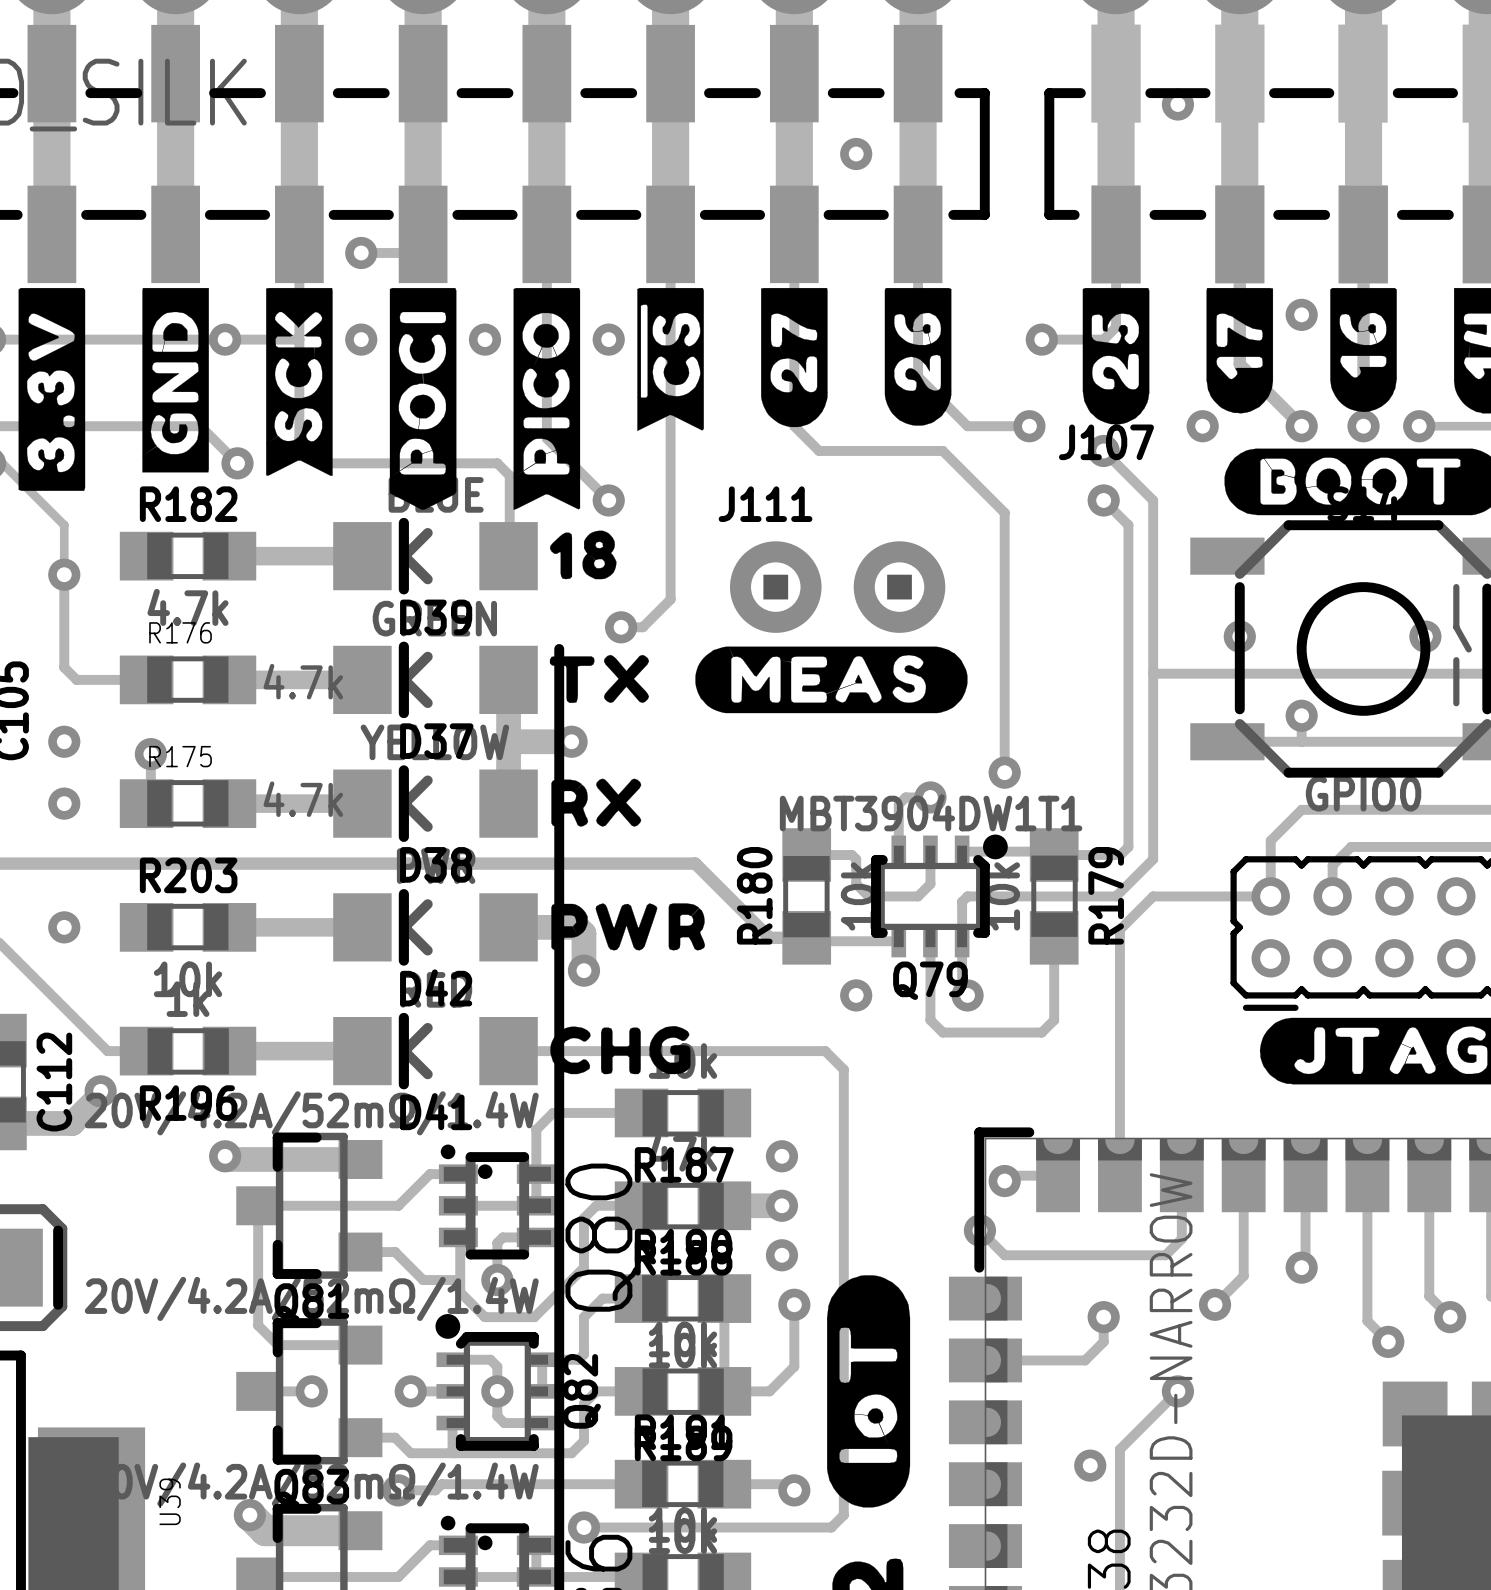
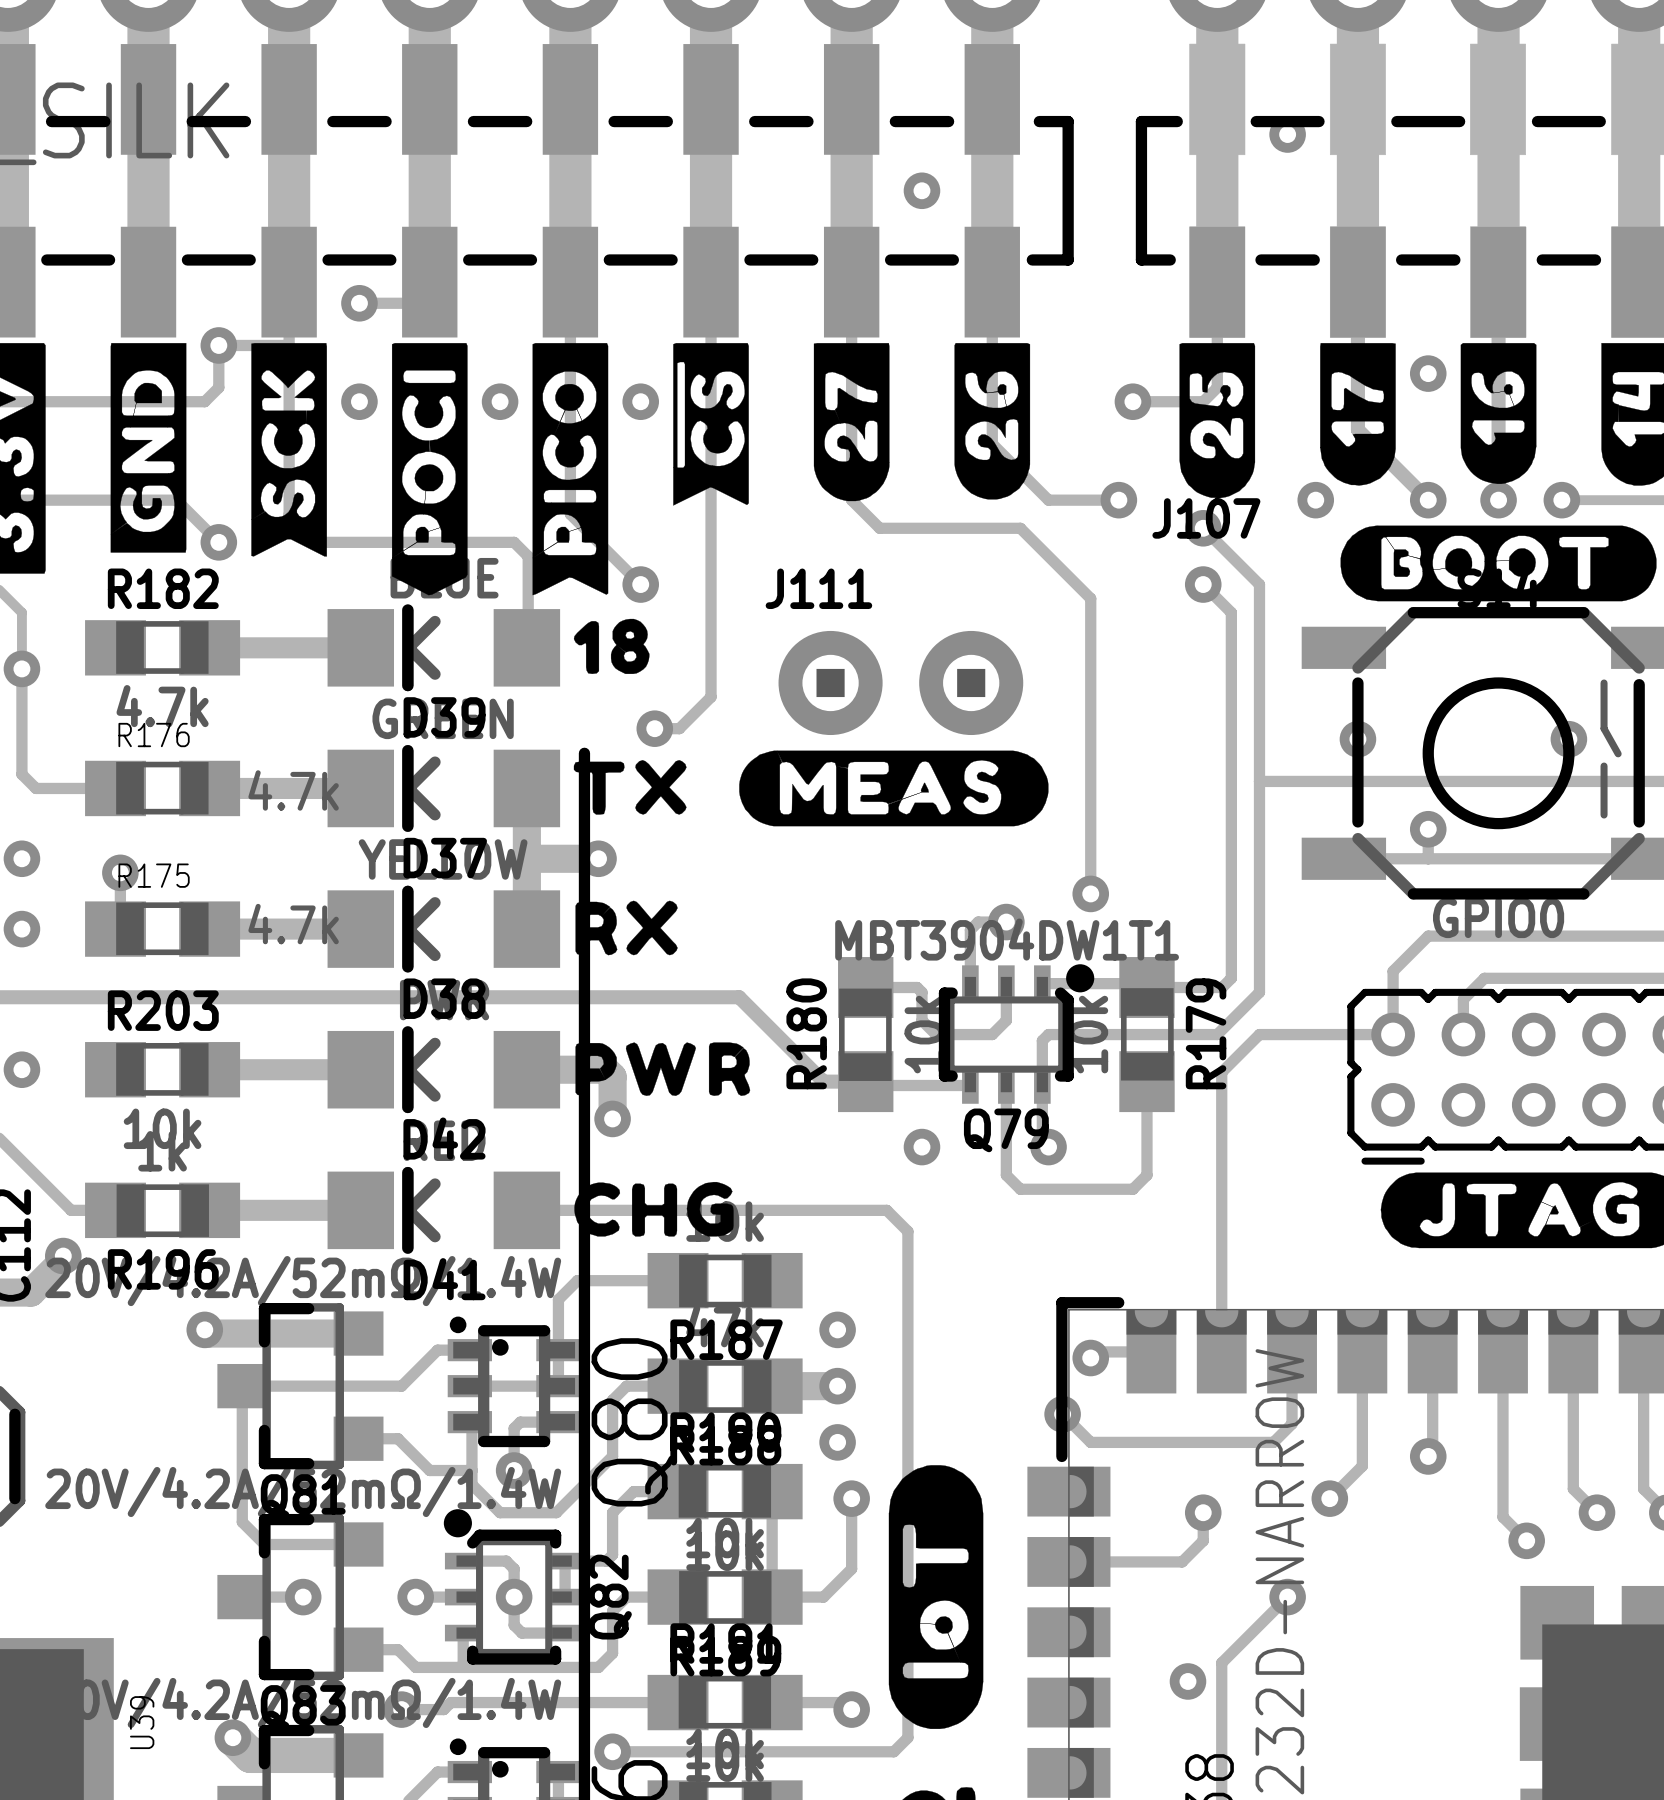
track: (225, 339) (299, 339) -> (204, 401) (218, 387) (218, 345) (289, 345)
via position: (225, 339) -> (218, 345)

